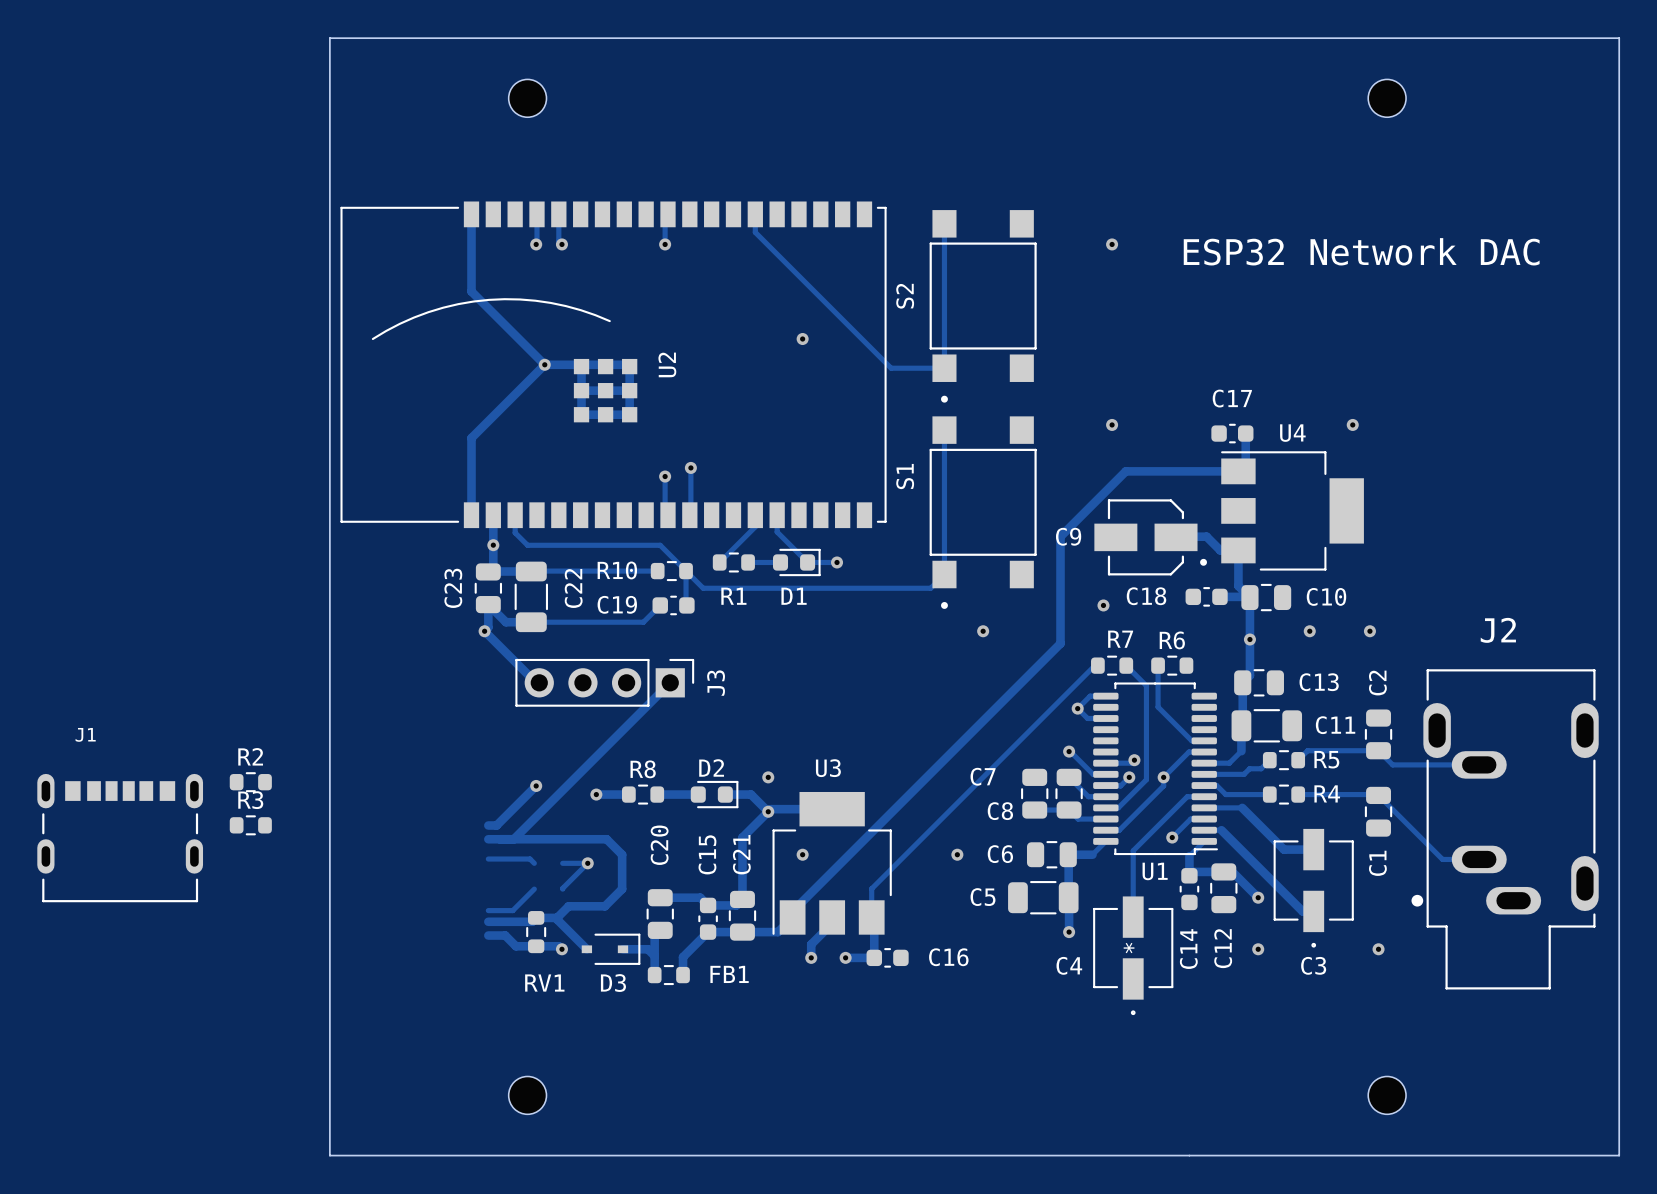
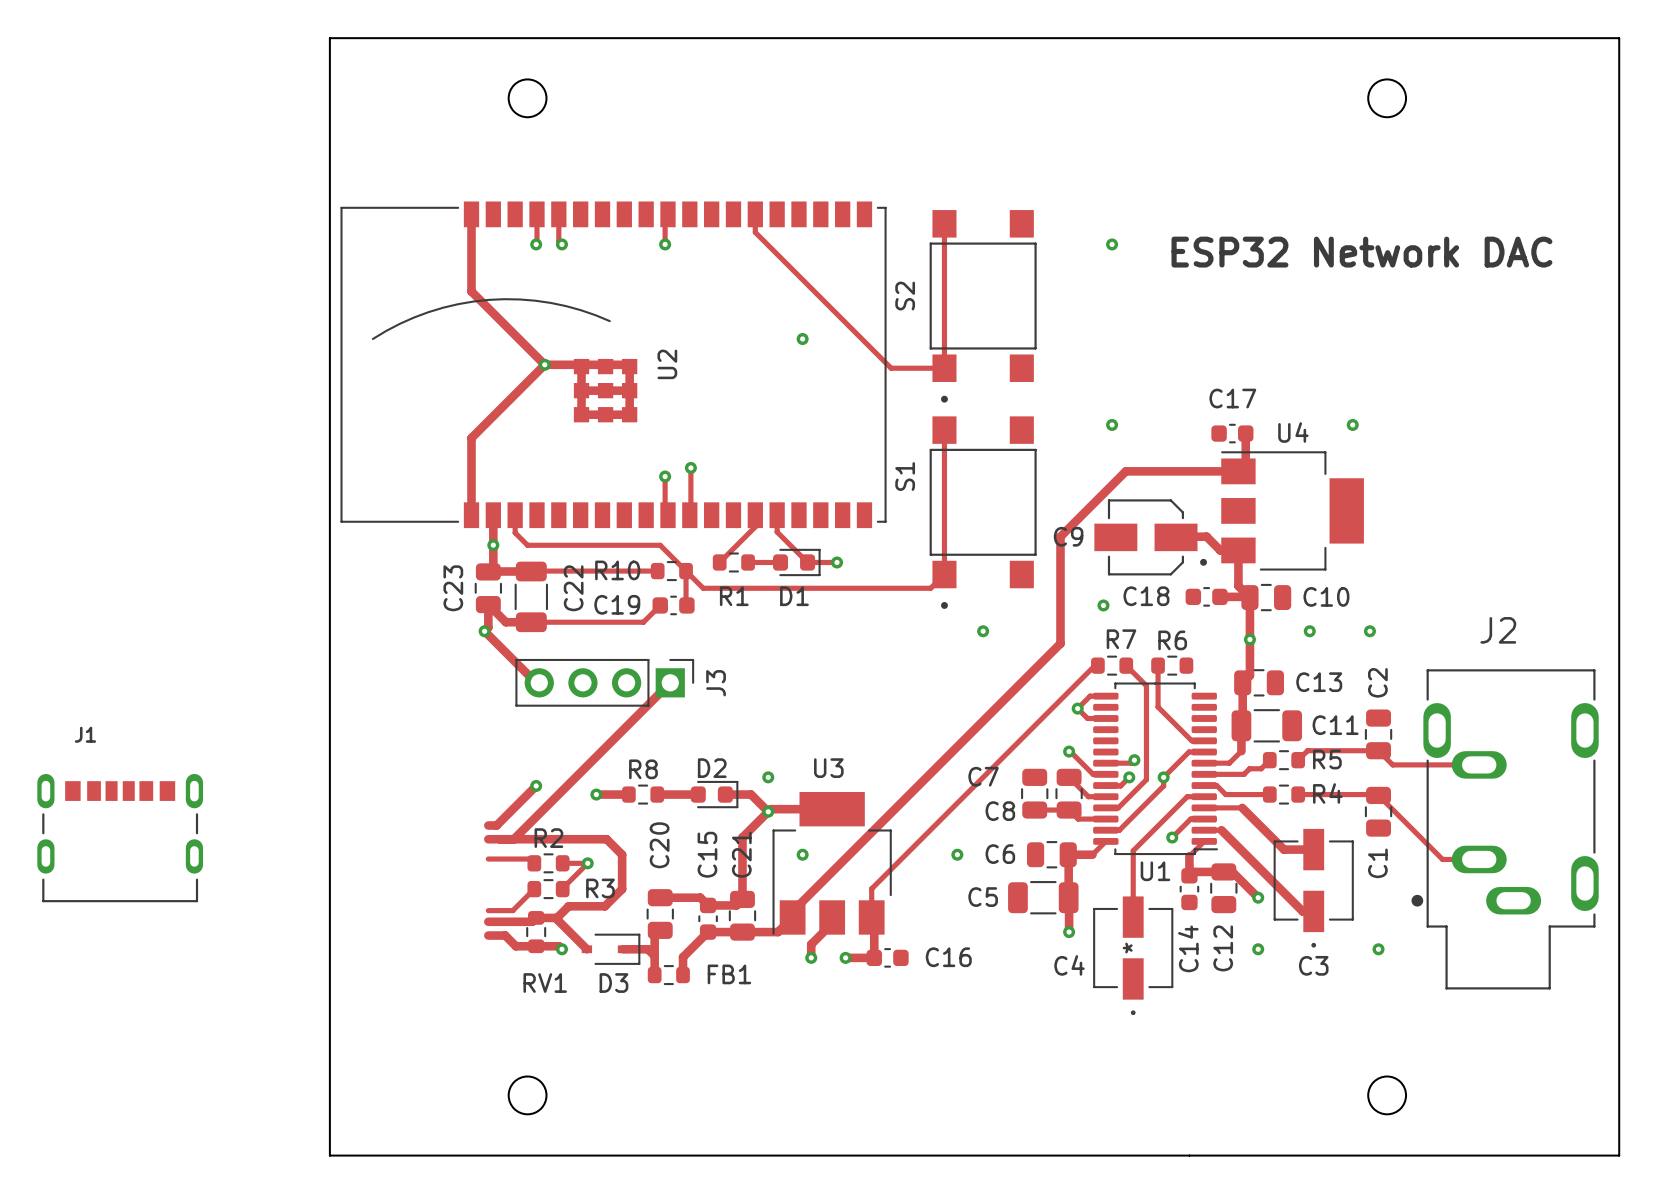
R2 position: (250, 782) -> (548, 863)
R3 name position: R3 (250, 800) -> R3 (600, 888)
R3 position: (250, 825) -> (548, 889)

